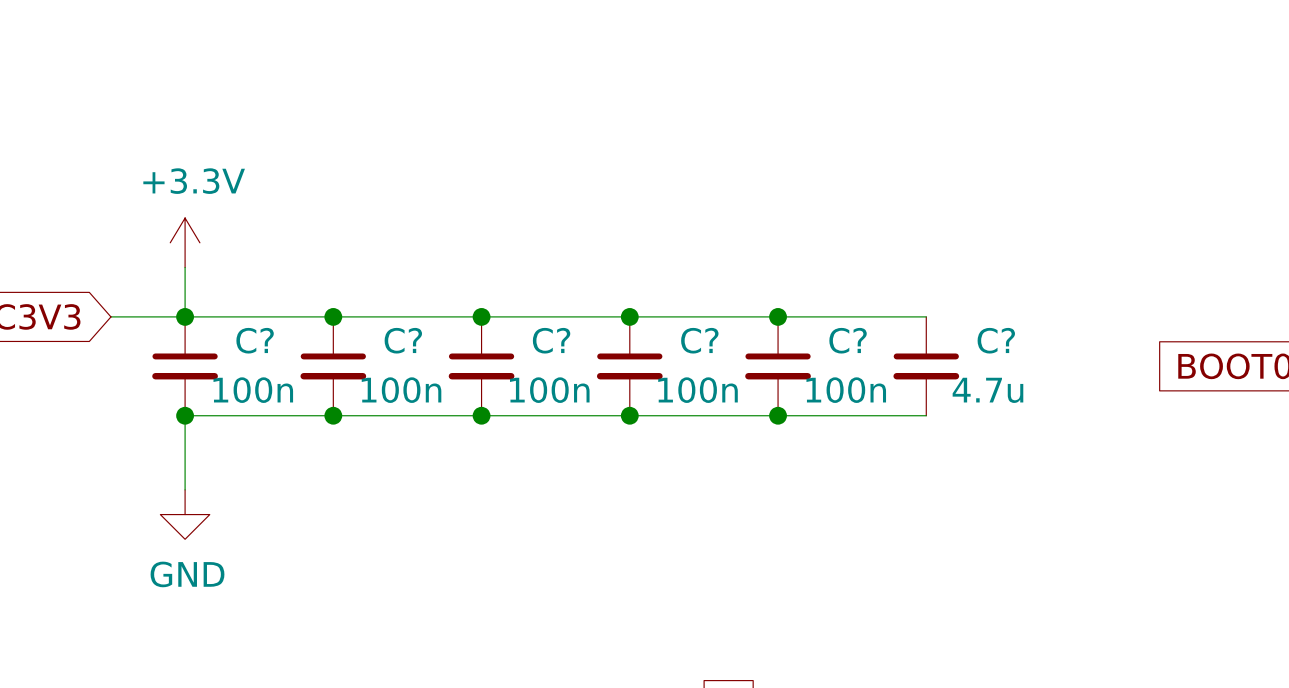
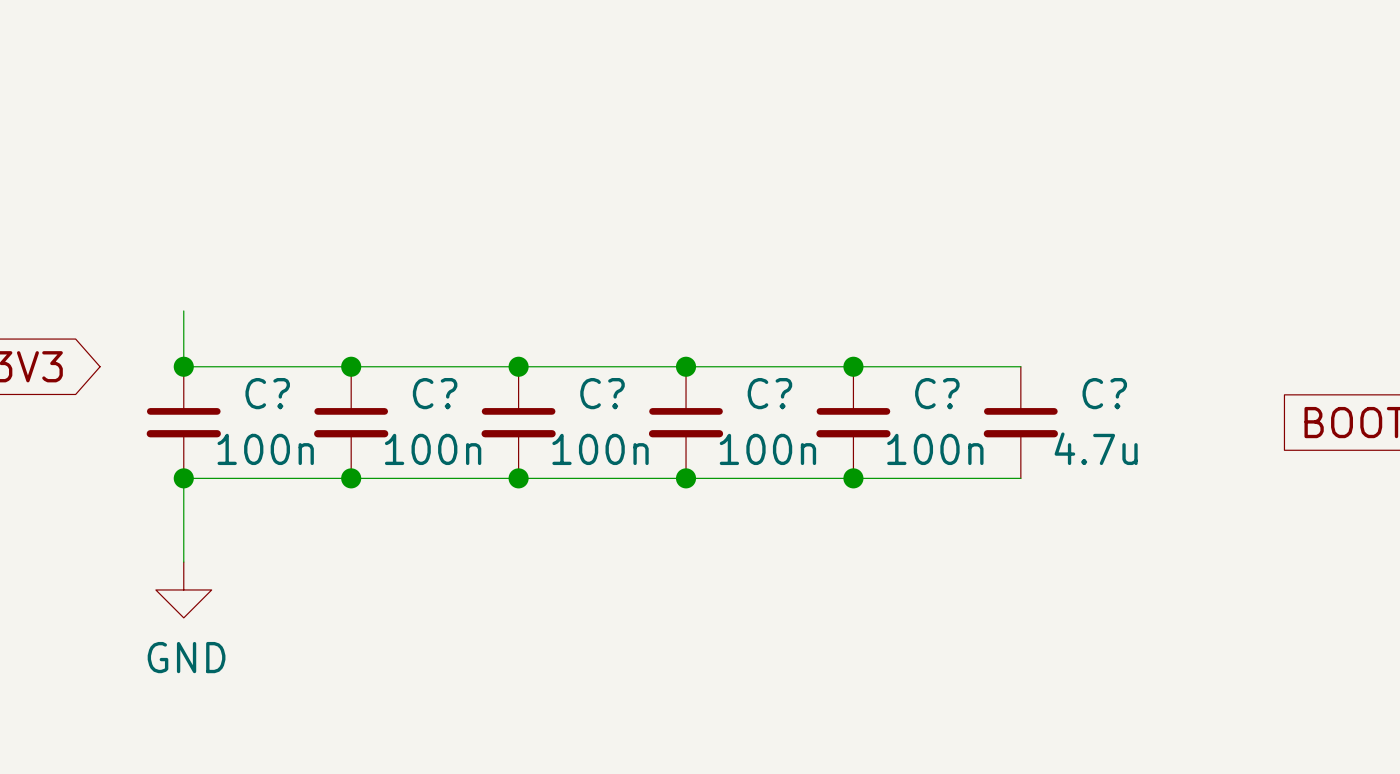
power symbol: +3.3V (185, 242) -> none
wire: (110, 316) (185, 316) -> none

